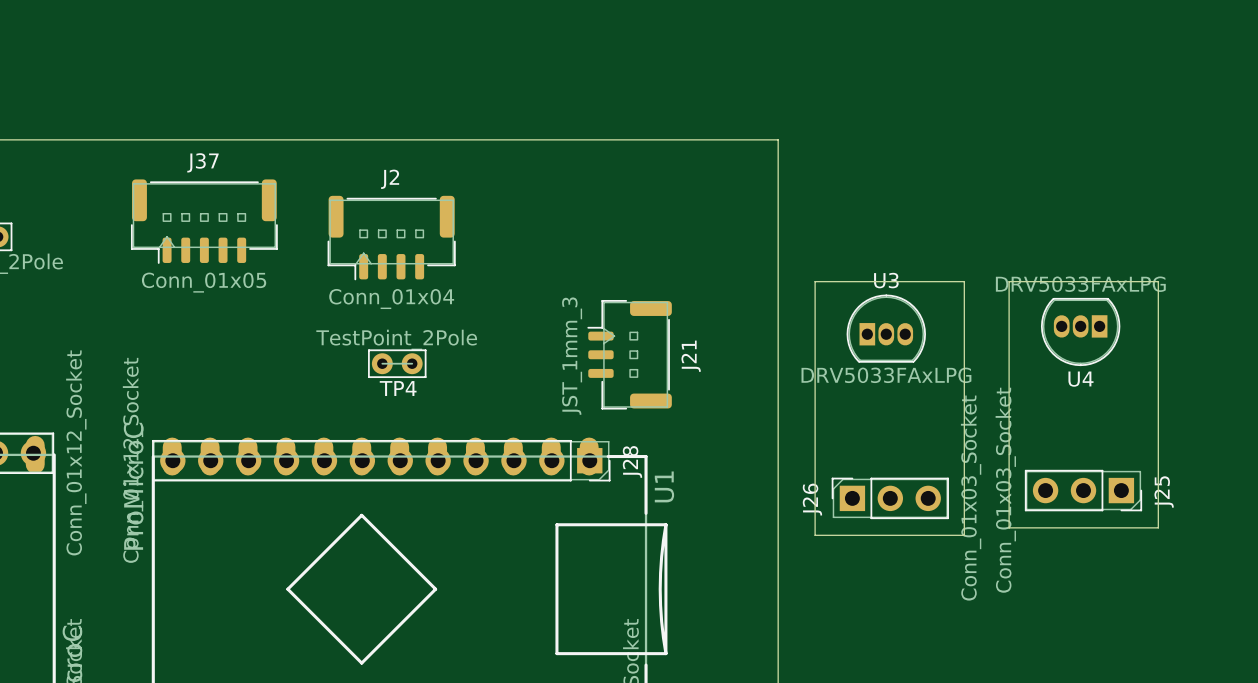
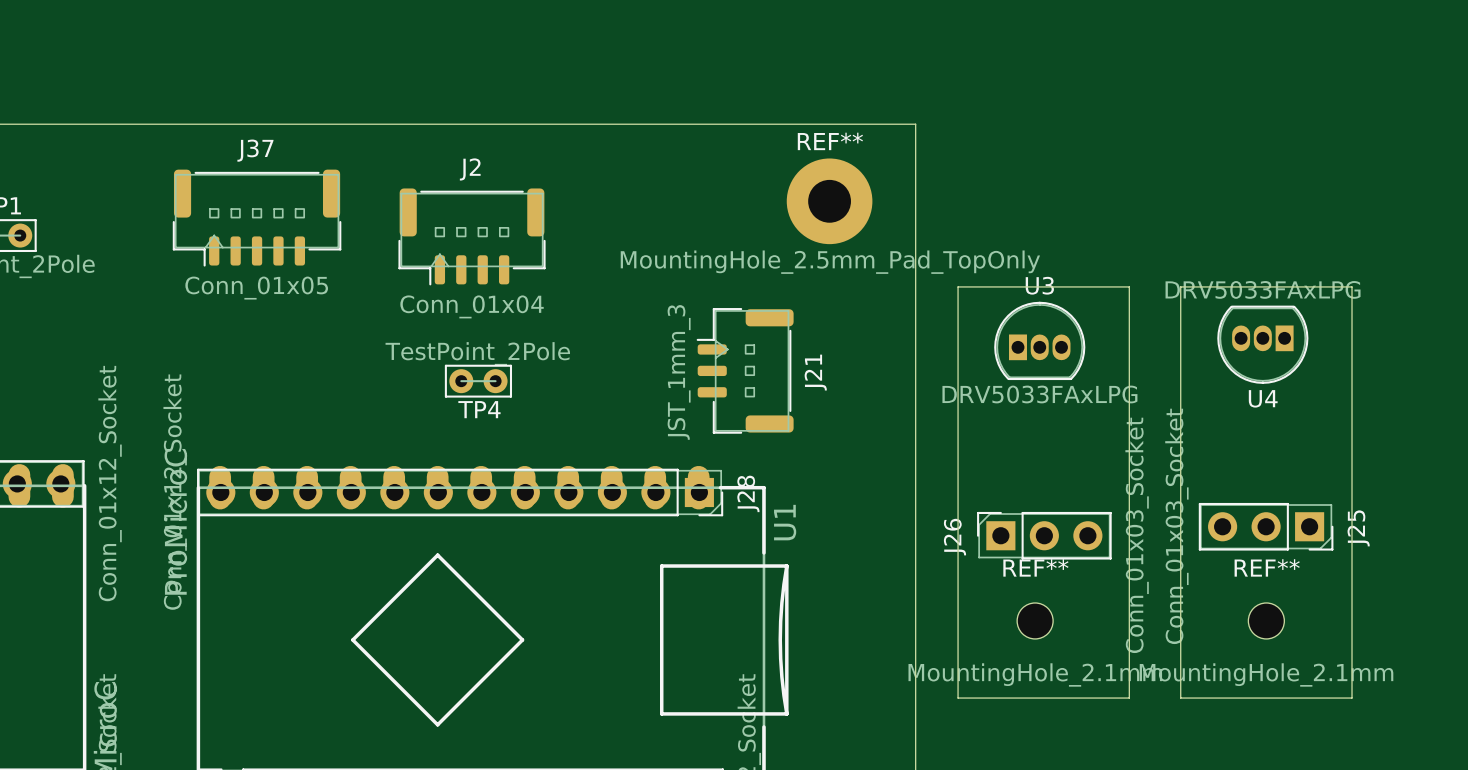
REF**: none -> MountingHole_2.5mm_Pad_TopOnly (829, 201)
board edge: (1009, 527) (1158, 527) -> (1180, 569) (1180, 698) (1352, 698) (1352, 569)
board edge: (815, 535) (964, 535) -> (958, 578) (958, 698) (1129, 698) (1129, 578)
REF**: none -> MountingHole_2.1mm (1035, 620)
REF**: none -> MountingHole_2.1mm (1266, 620)

